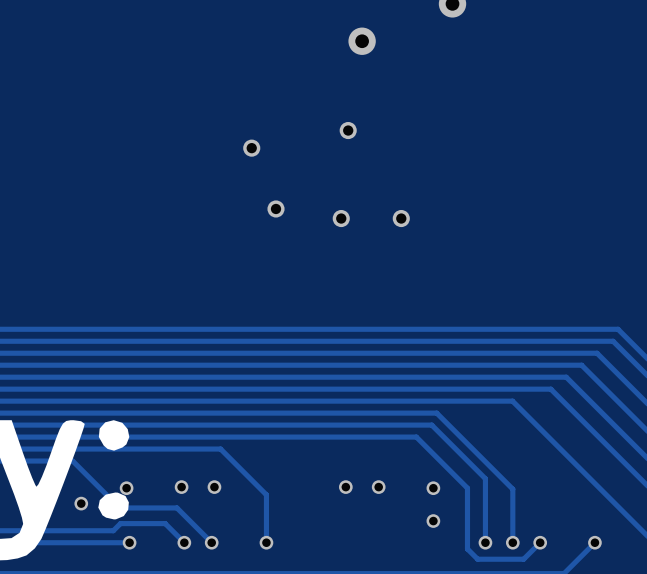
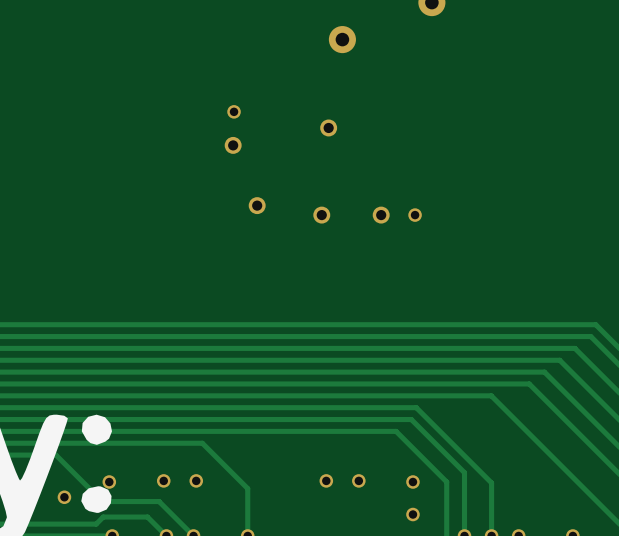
via: none -> (234, 111)
via: none -> (415, 215)

